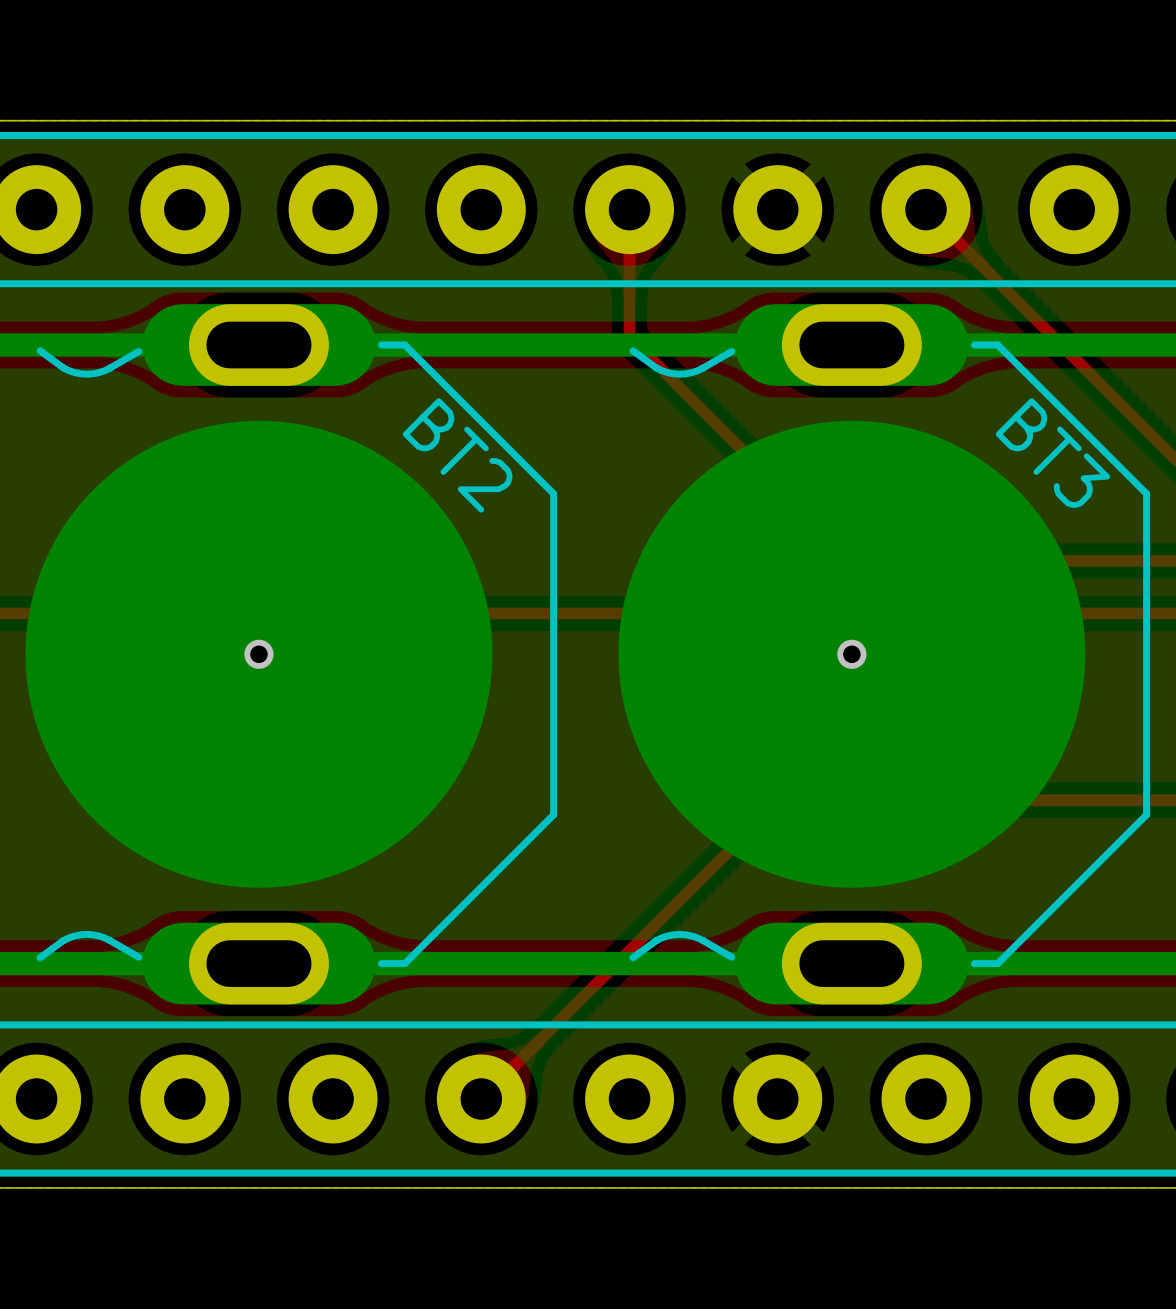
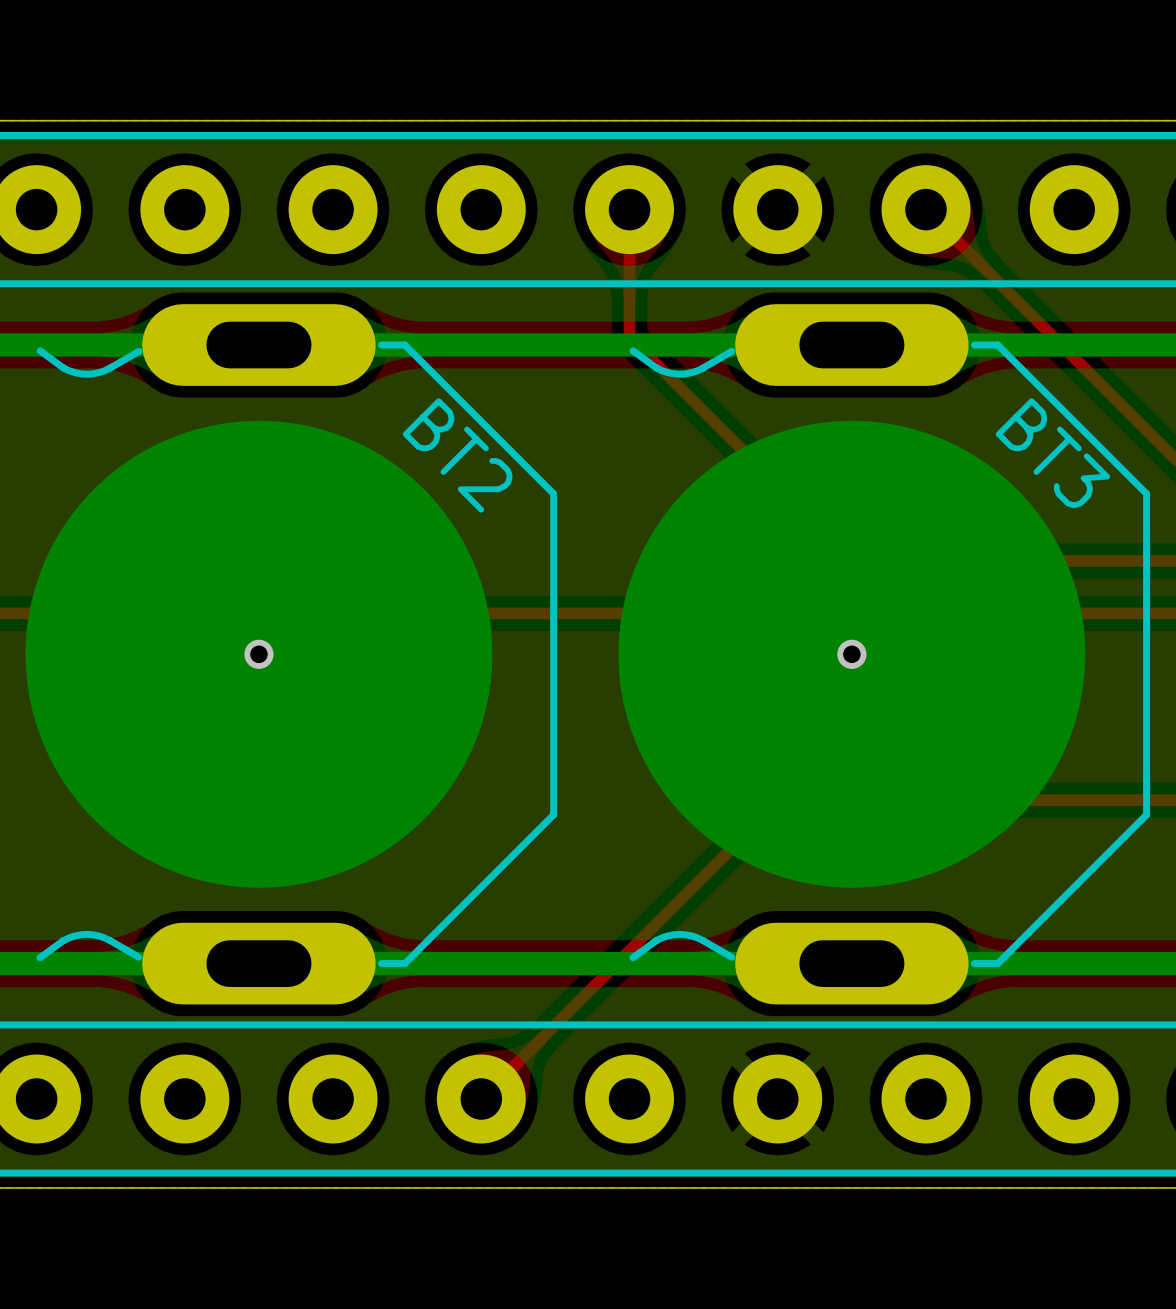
BT2 footprint: [25, 304, 558, 1005] -> [25, 304, 558, 1005]
BT3 footprint: [618, 304, 1151, 1005] -> [618, 304, 1151, 1005]

